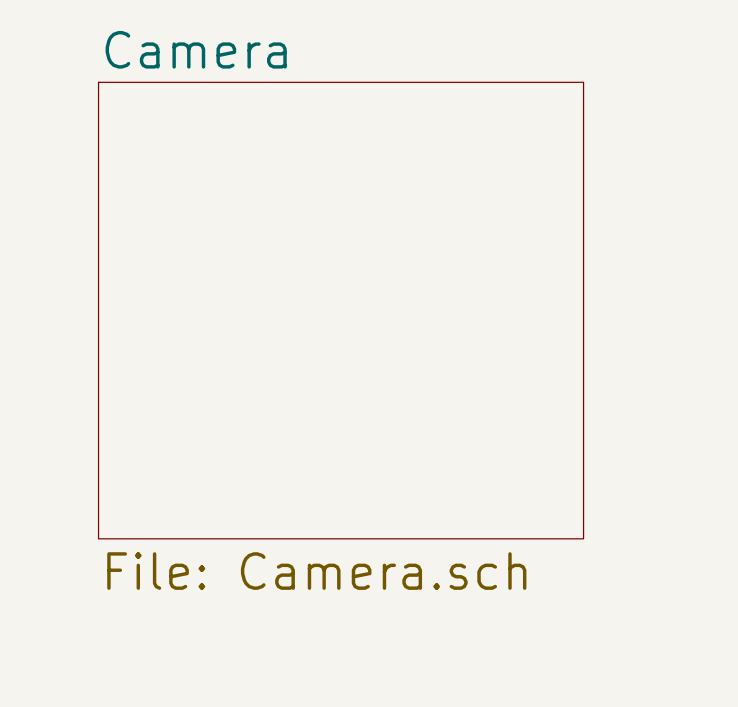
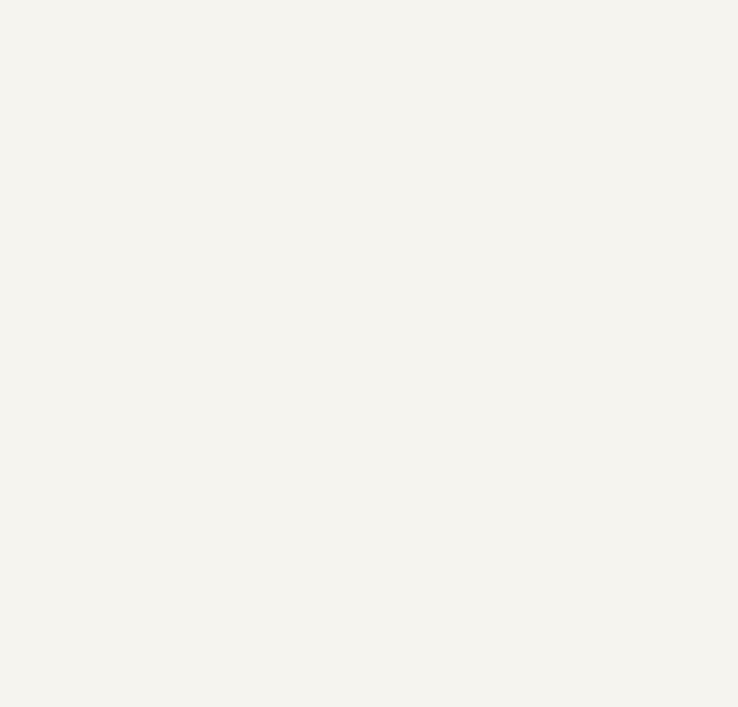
sheet Camera: File: Camera.sch (341, 310) -> none

